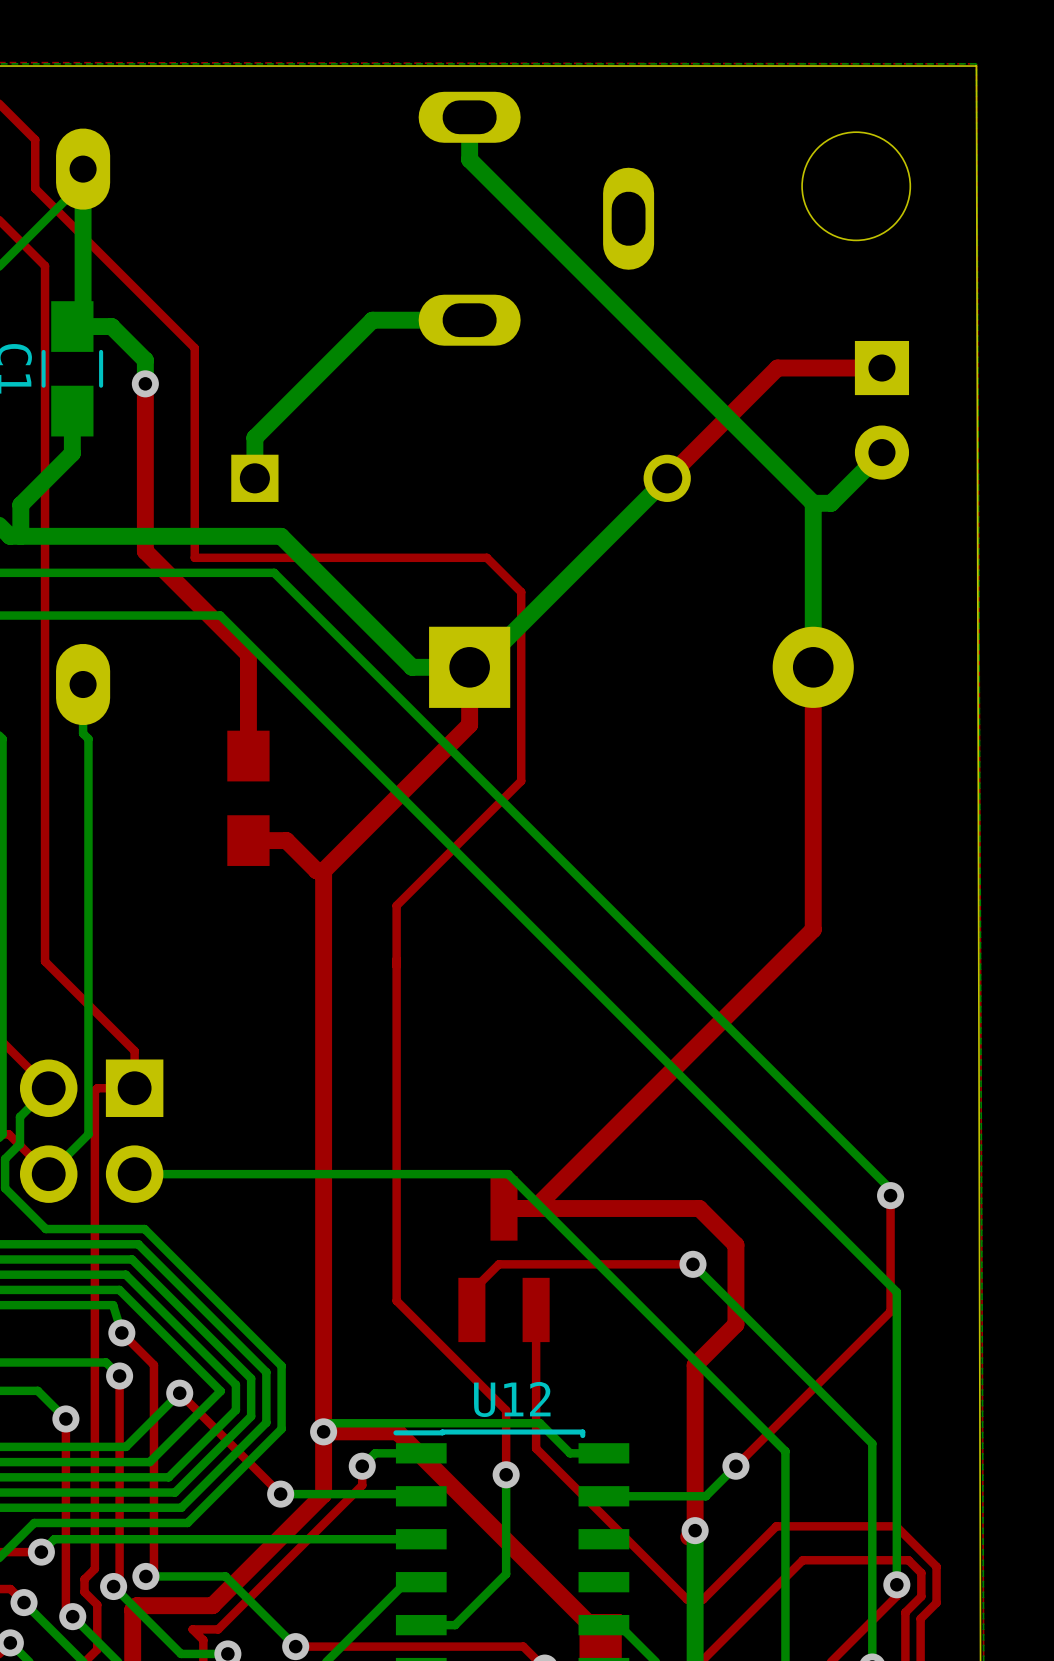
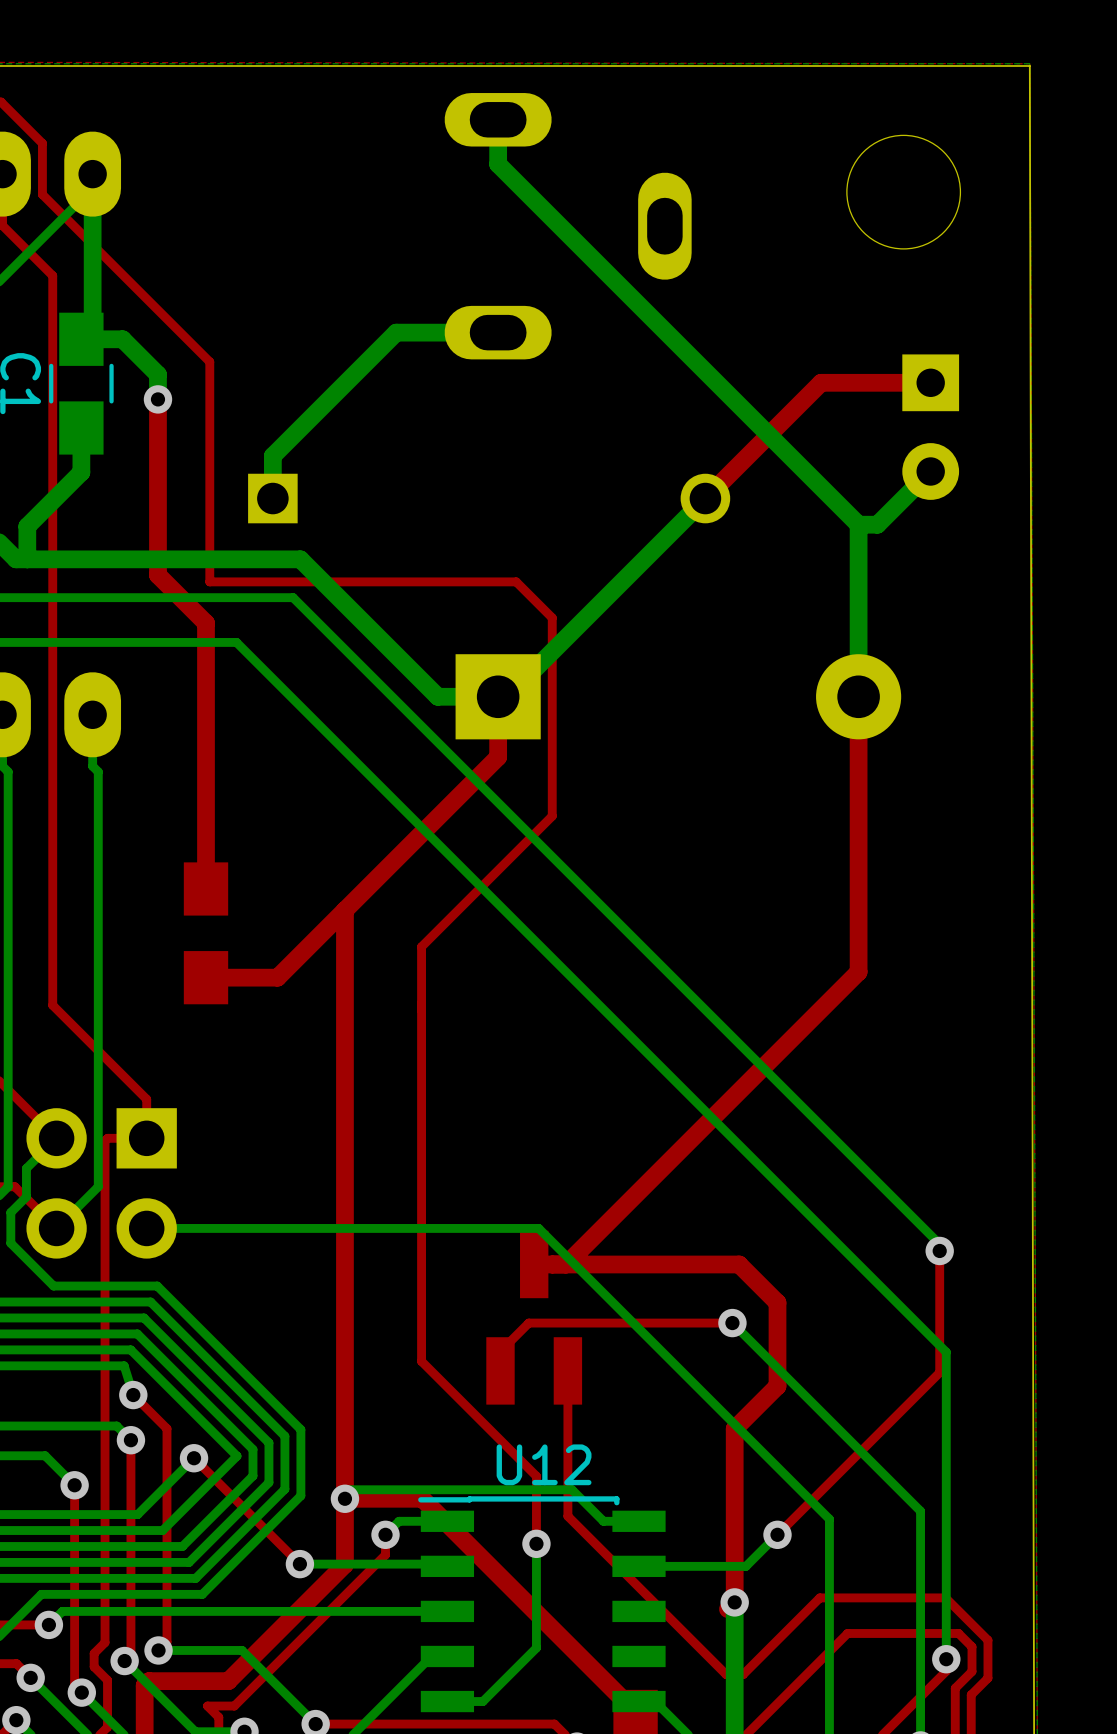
top track: (191, 597) (248, 654) (248, 756) -> (206, 623) (206, 888)
part position: (248, 798) -> (206, 933)
top track: (248, 840) (286, 840) (316, 870) (323, 870) -> (206, 977) (277, 977) (344, 910)

